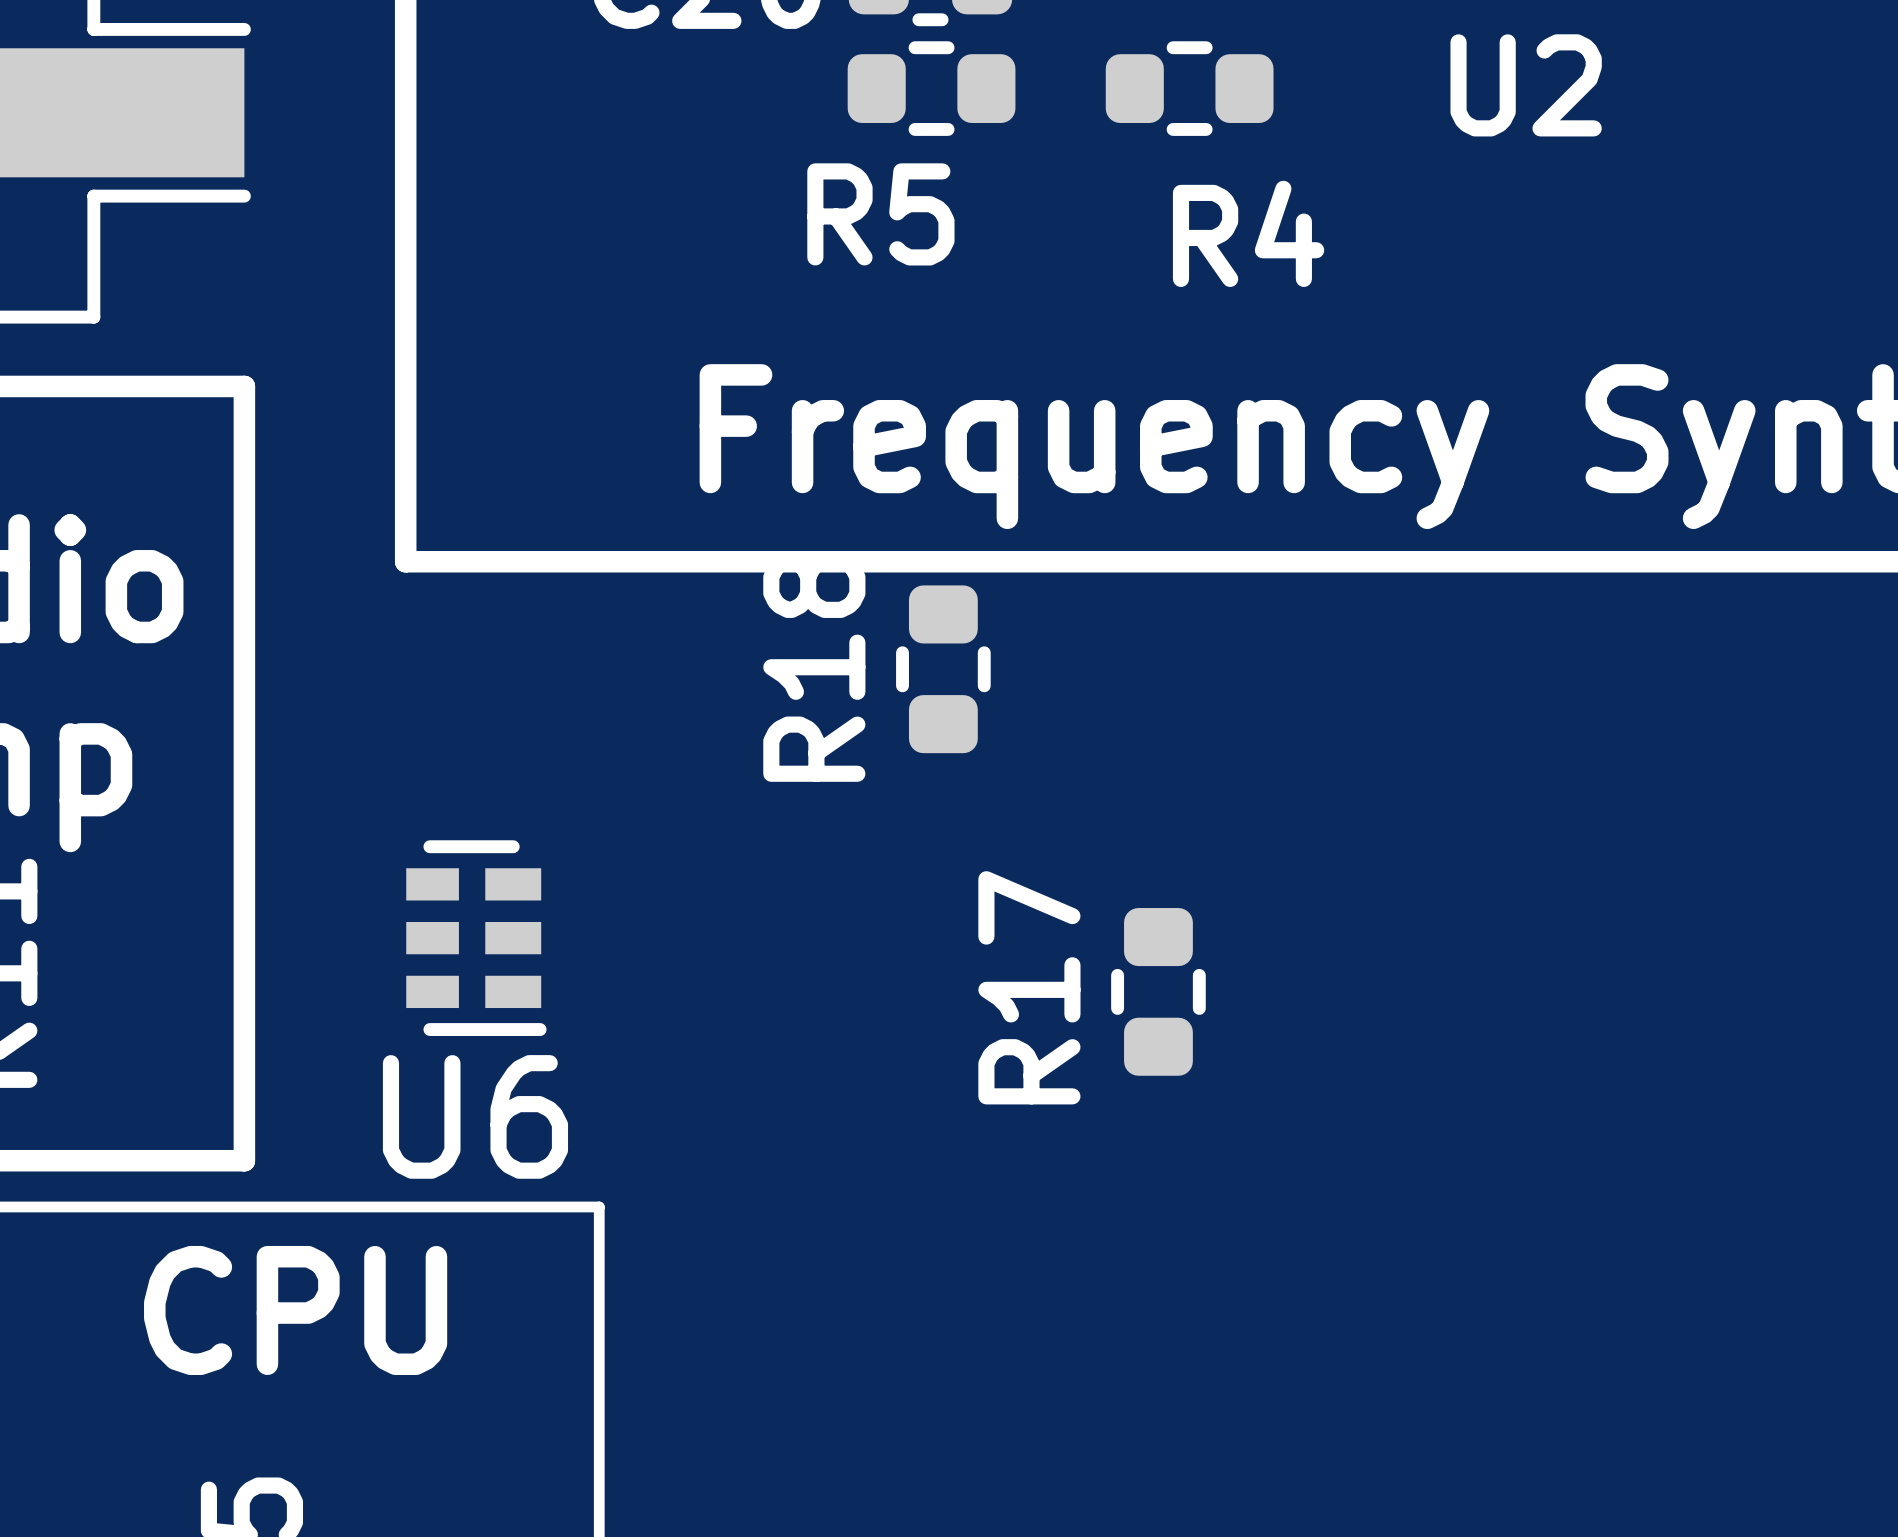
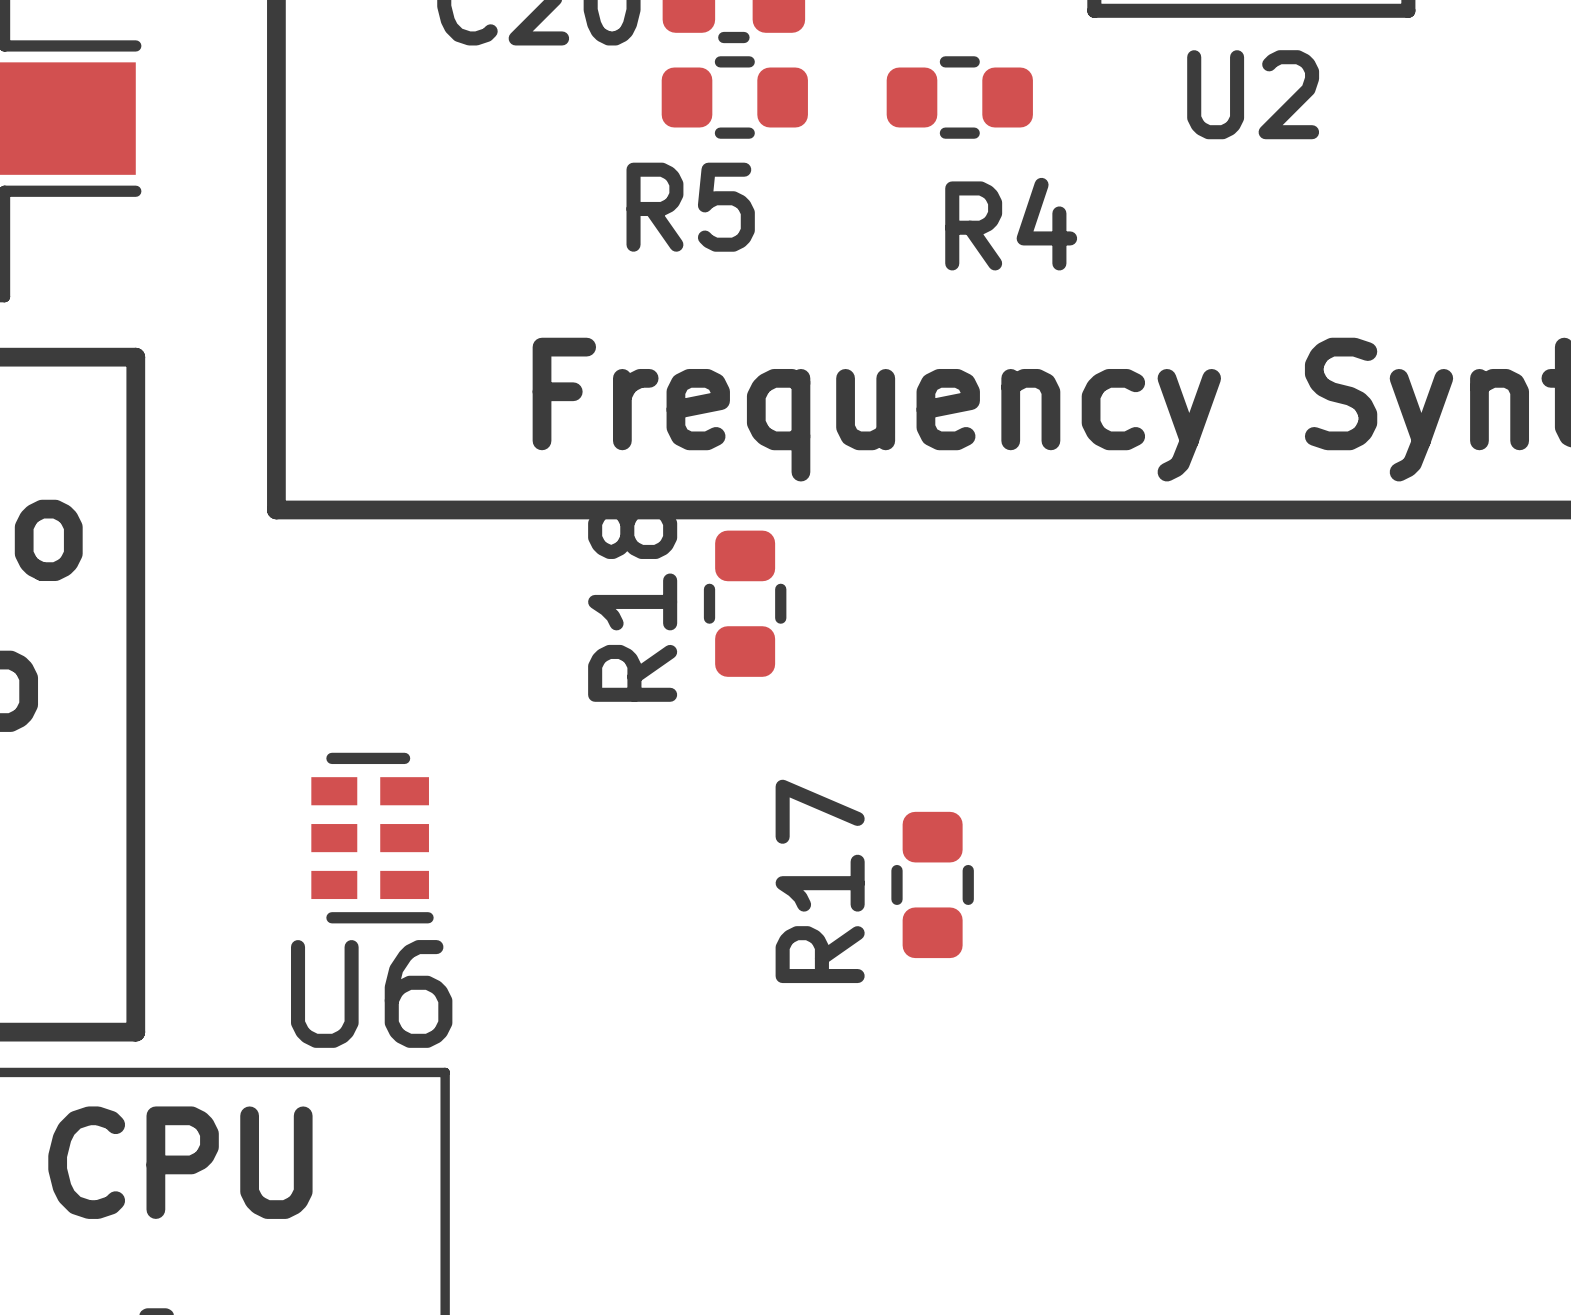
U6 position: (476, 938) -> (372, 838)

